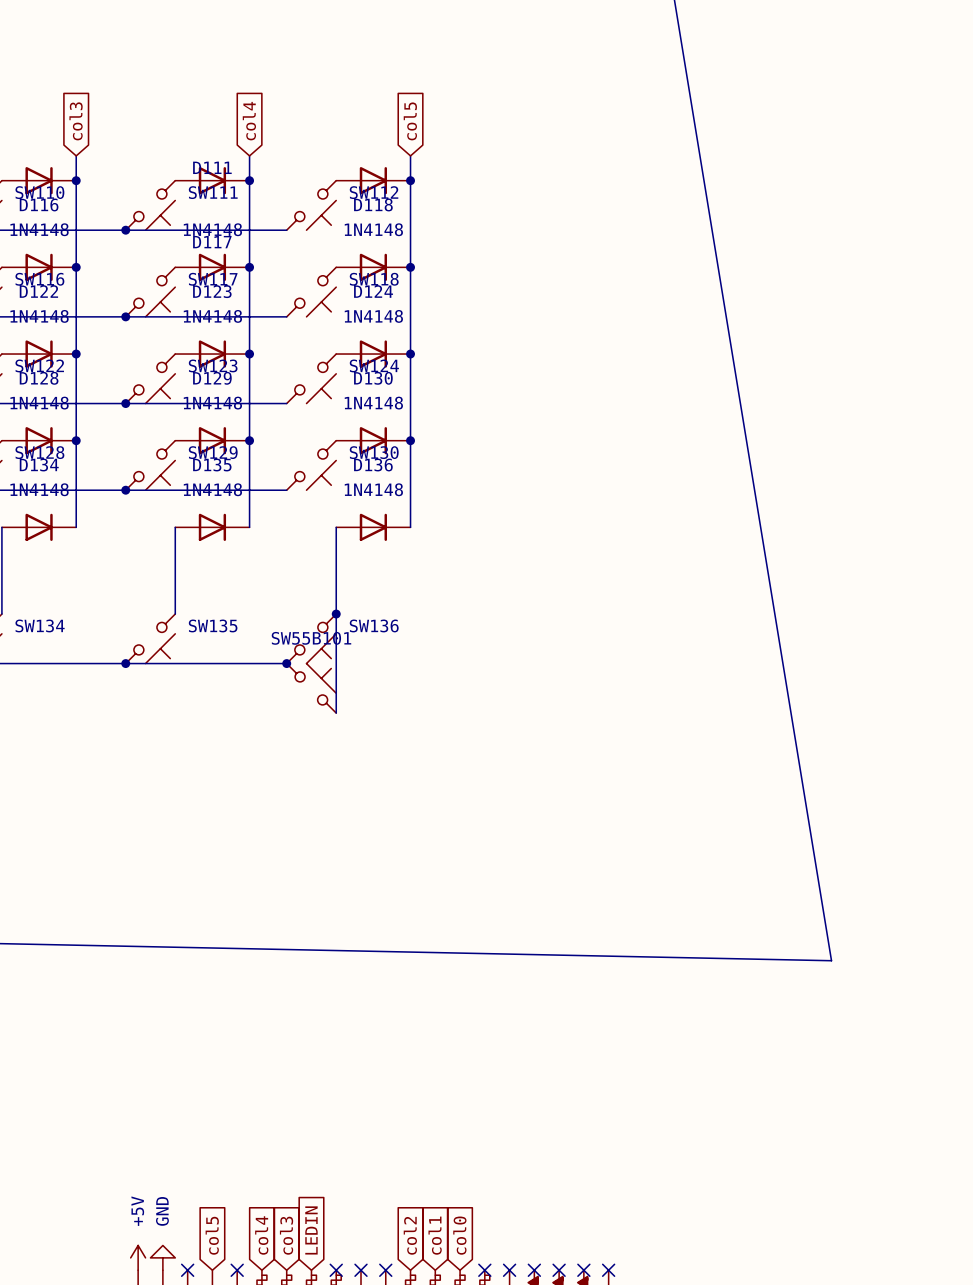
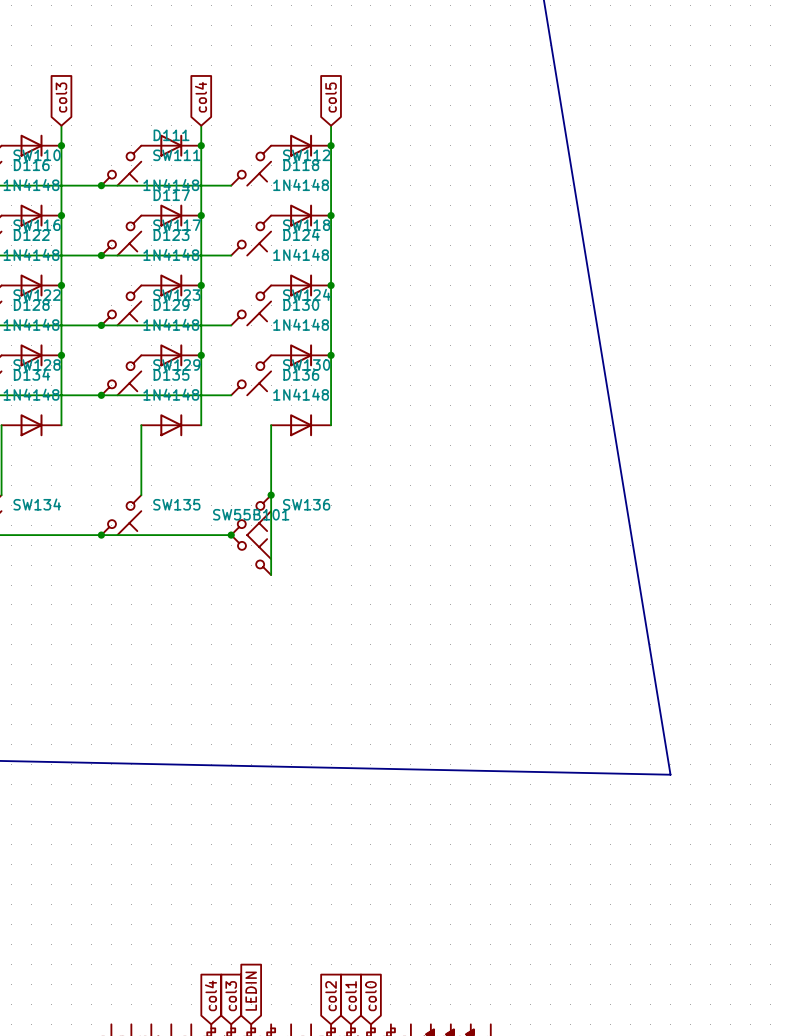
global label: col5 (212, 1235) -> none
power symbol: +5V (138, 1257) -> none
power symbol: GND (162, 1257) -> none
no-connect mark: (187, 1270) -> none
no-connect mark: (237, 1270) -> none
no-connect mark: (336, 1270) -> none
no-connect mark: (361, 1270) -> none
no-connect mark: (385, 1270) -> none
no-connect mark: (484, 1270) -> none
no-connect mark: (509, 1270) -> none
no-connect mark: (534, 1270) -> none
no-connect mark: (559, 1270) -> none
no-connect mark: (583, 1270) -> none
no-connect mark: (608, 1270) -> none

